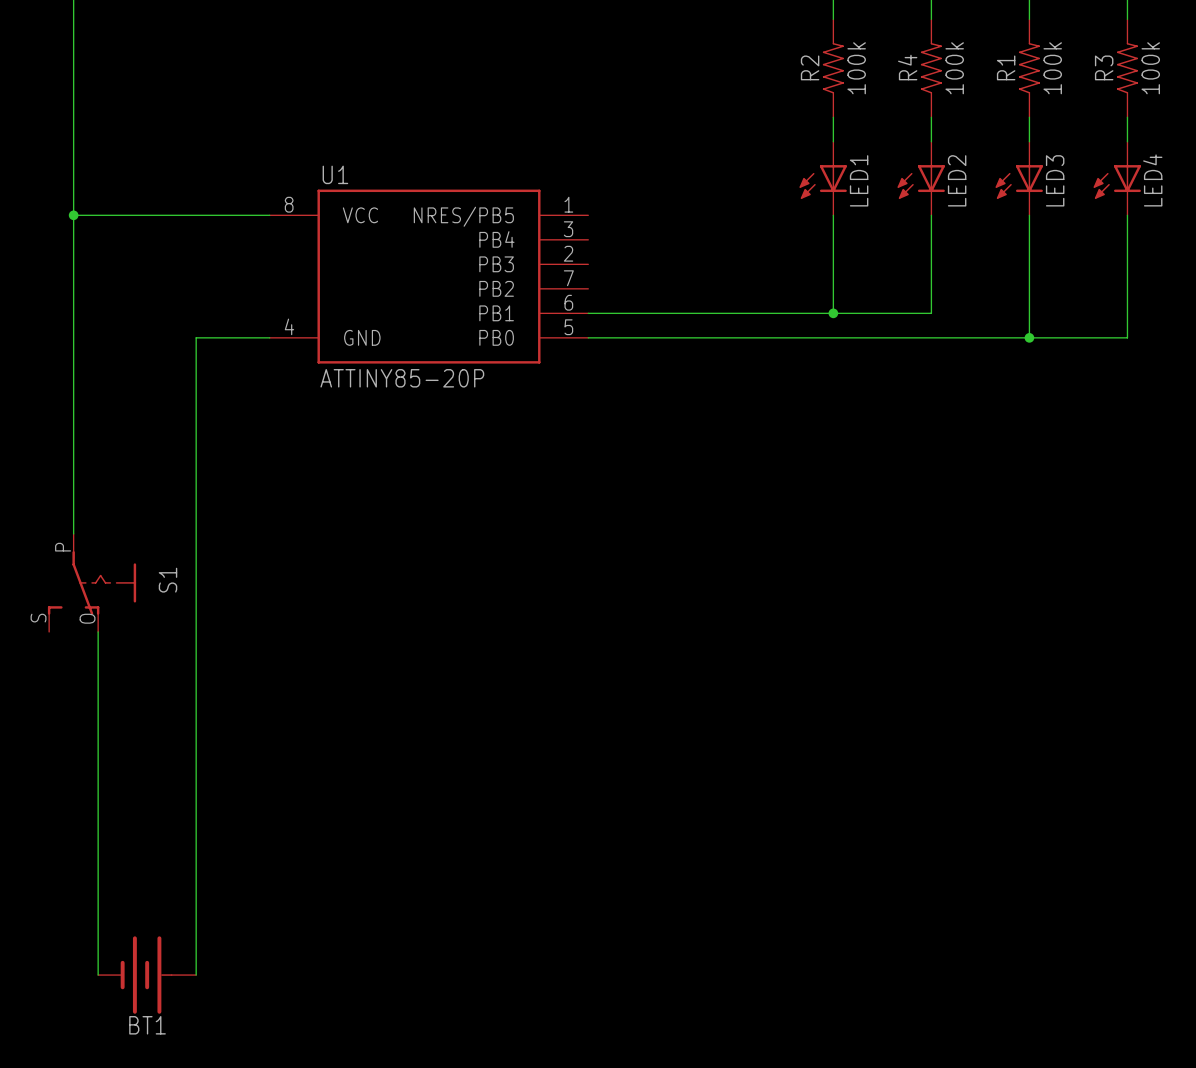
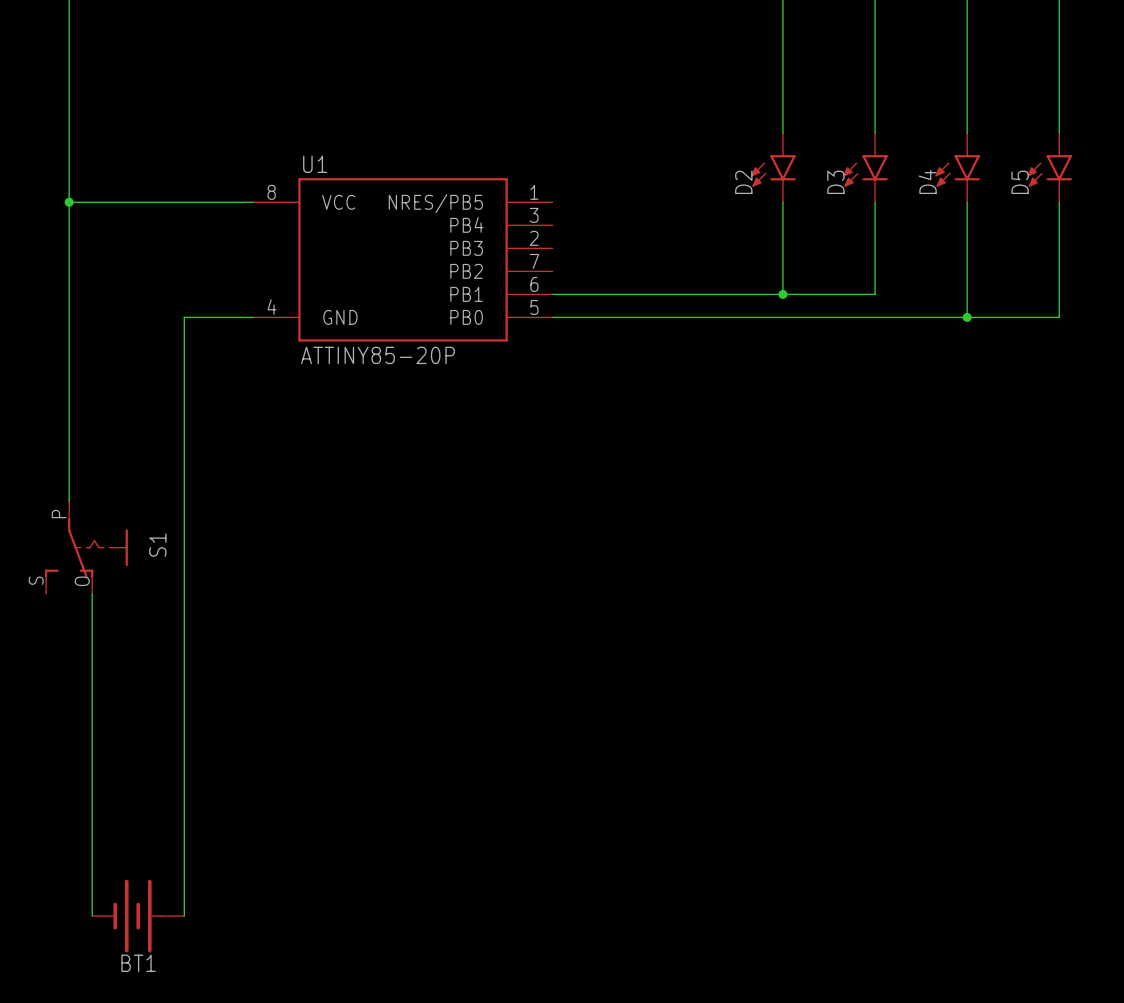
R2: 100k (833, 68) -> none
R4: 100k (931, 68) -> none
R1: 100k (1029, 68) -> none
R3: 100k (1127, 68) -> none
LED1: (823, 178) -> none
D2: none -> (773, 167)
LED2: (921, 178) -> none
D3: none -> (865, 167)
LED3: (1019, 178) -> none
D4: none -> (957, 167)
LED4: (1117, 178) -> none
D5: none -> (1049, 167)

